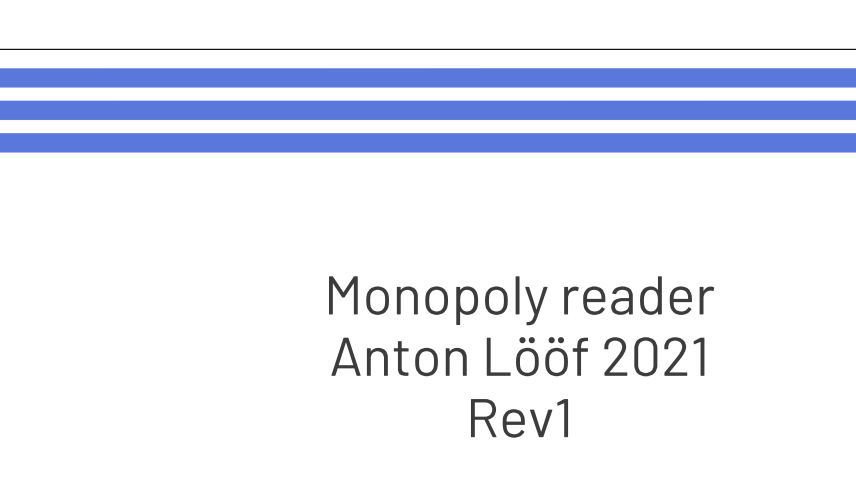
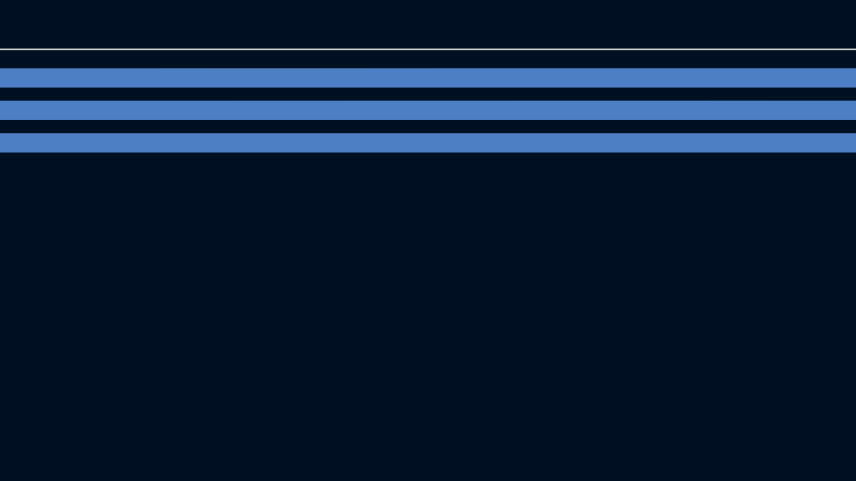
text: Monopoly reader (521, 300) -> none
text: Anton Lööf 2021 (517, 356) -> none
text: Rev1 (519, 418) -> none

